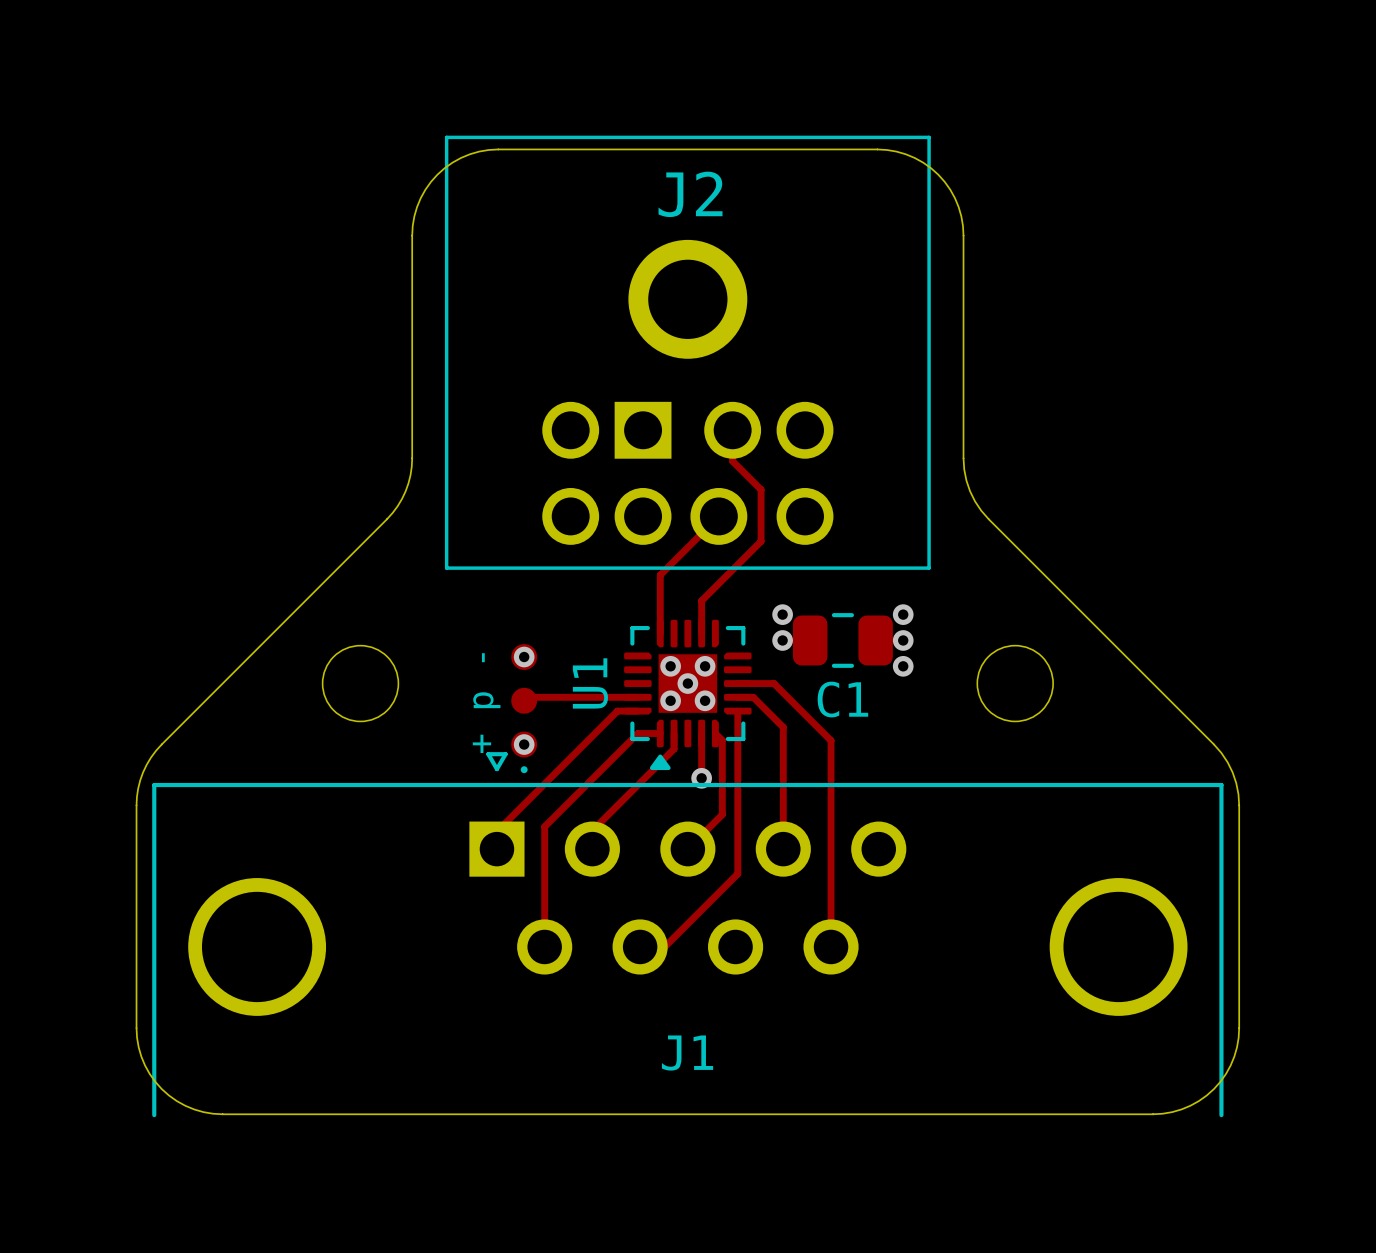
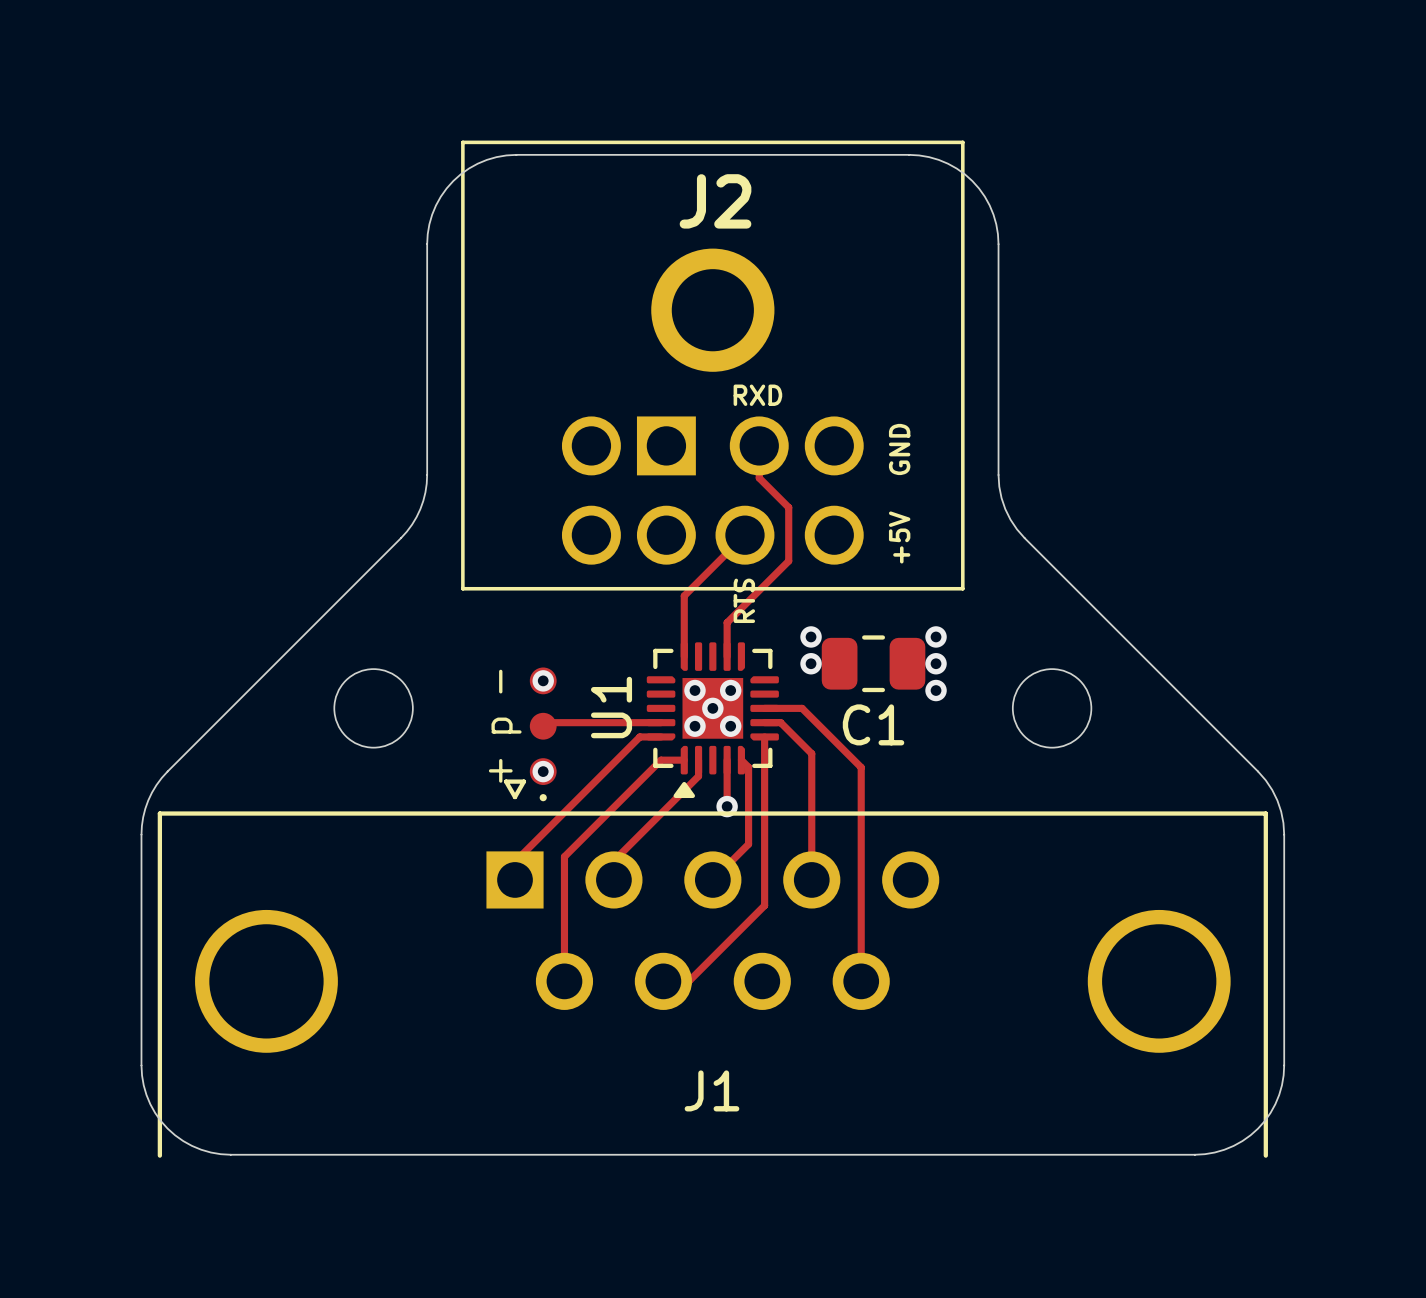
text: none -> RXD (757, 395)
text: none -> GND (899, 449)
text: none -> +5V (899, 537)
text: none -> RTS (744, 600)

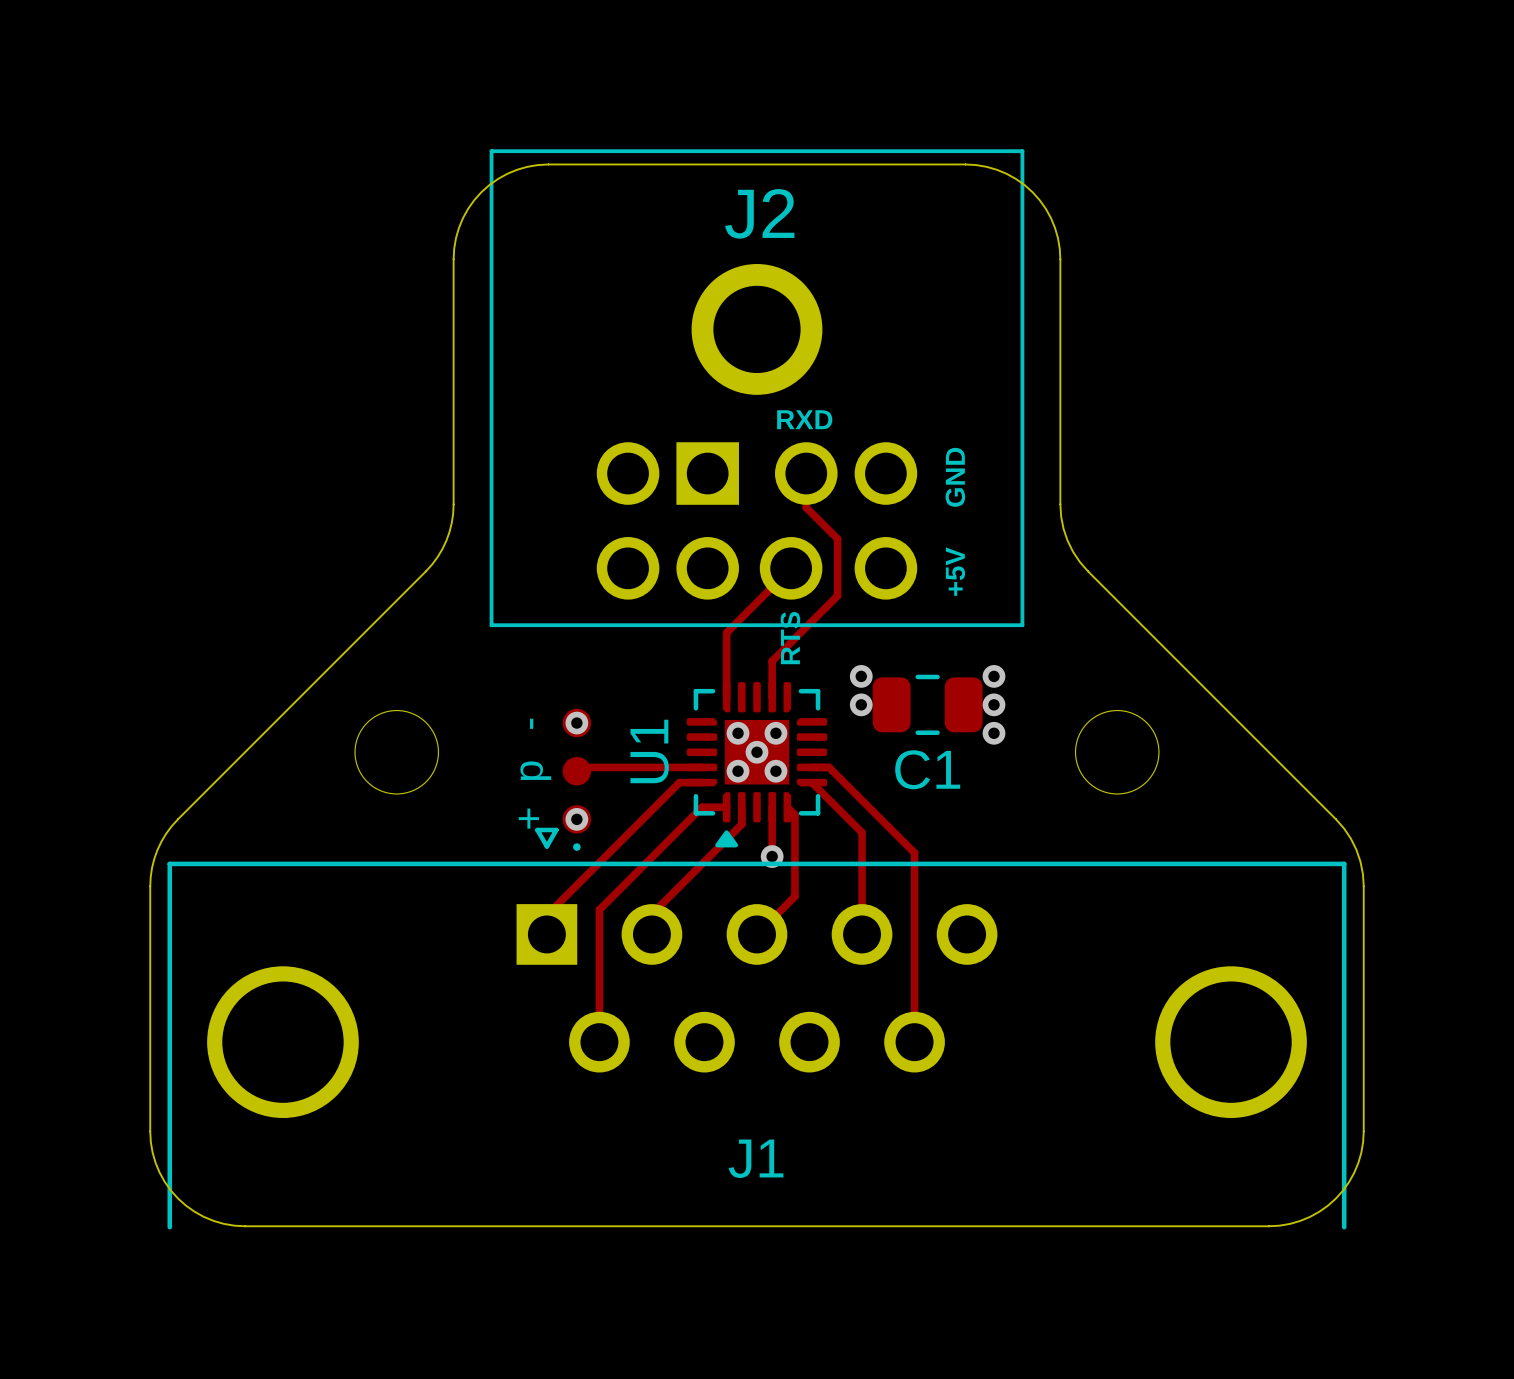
track: (764, 708) (802, 708) (861, 767) (861, 803) -> (862, 800) (914, 852)
track: (764, 736) (764, 905) (688, 981) (663, 981) -> none
track: (811, 753) (811, 784) -> (811, 782) (862, 832)

